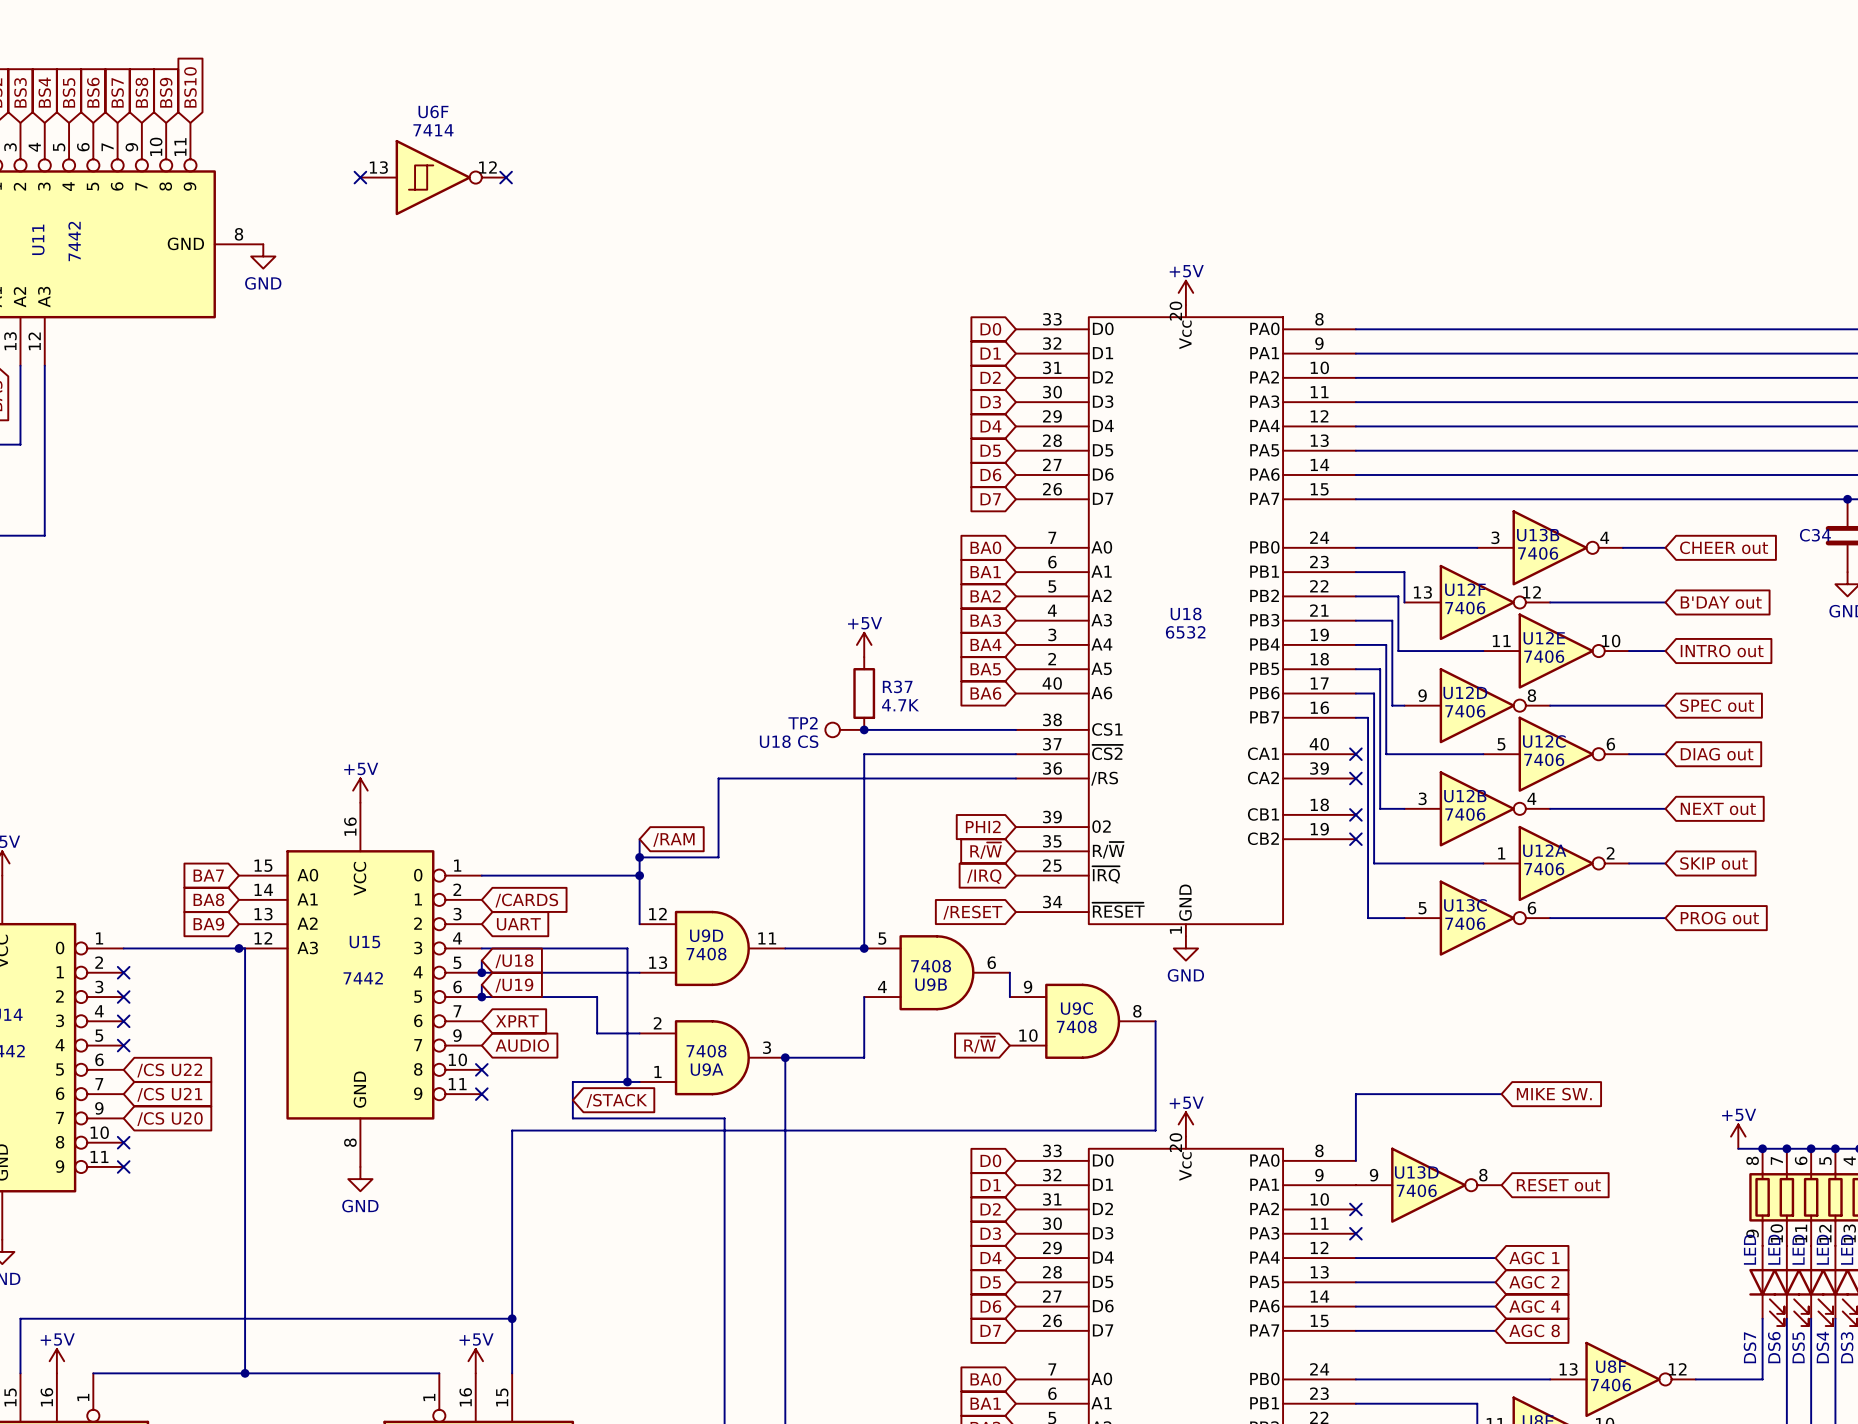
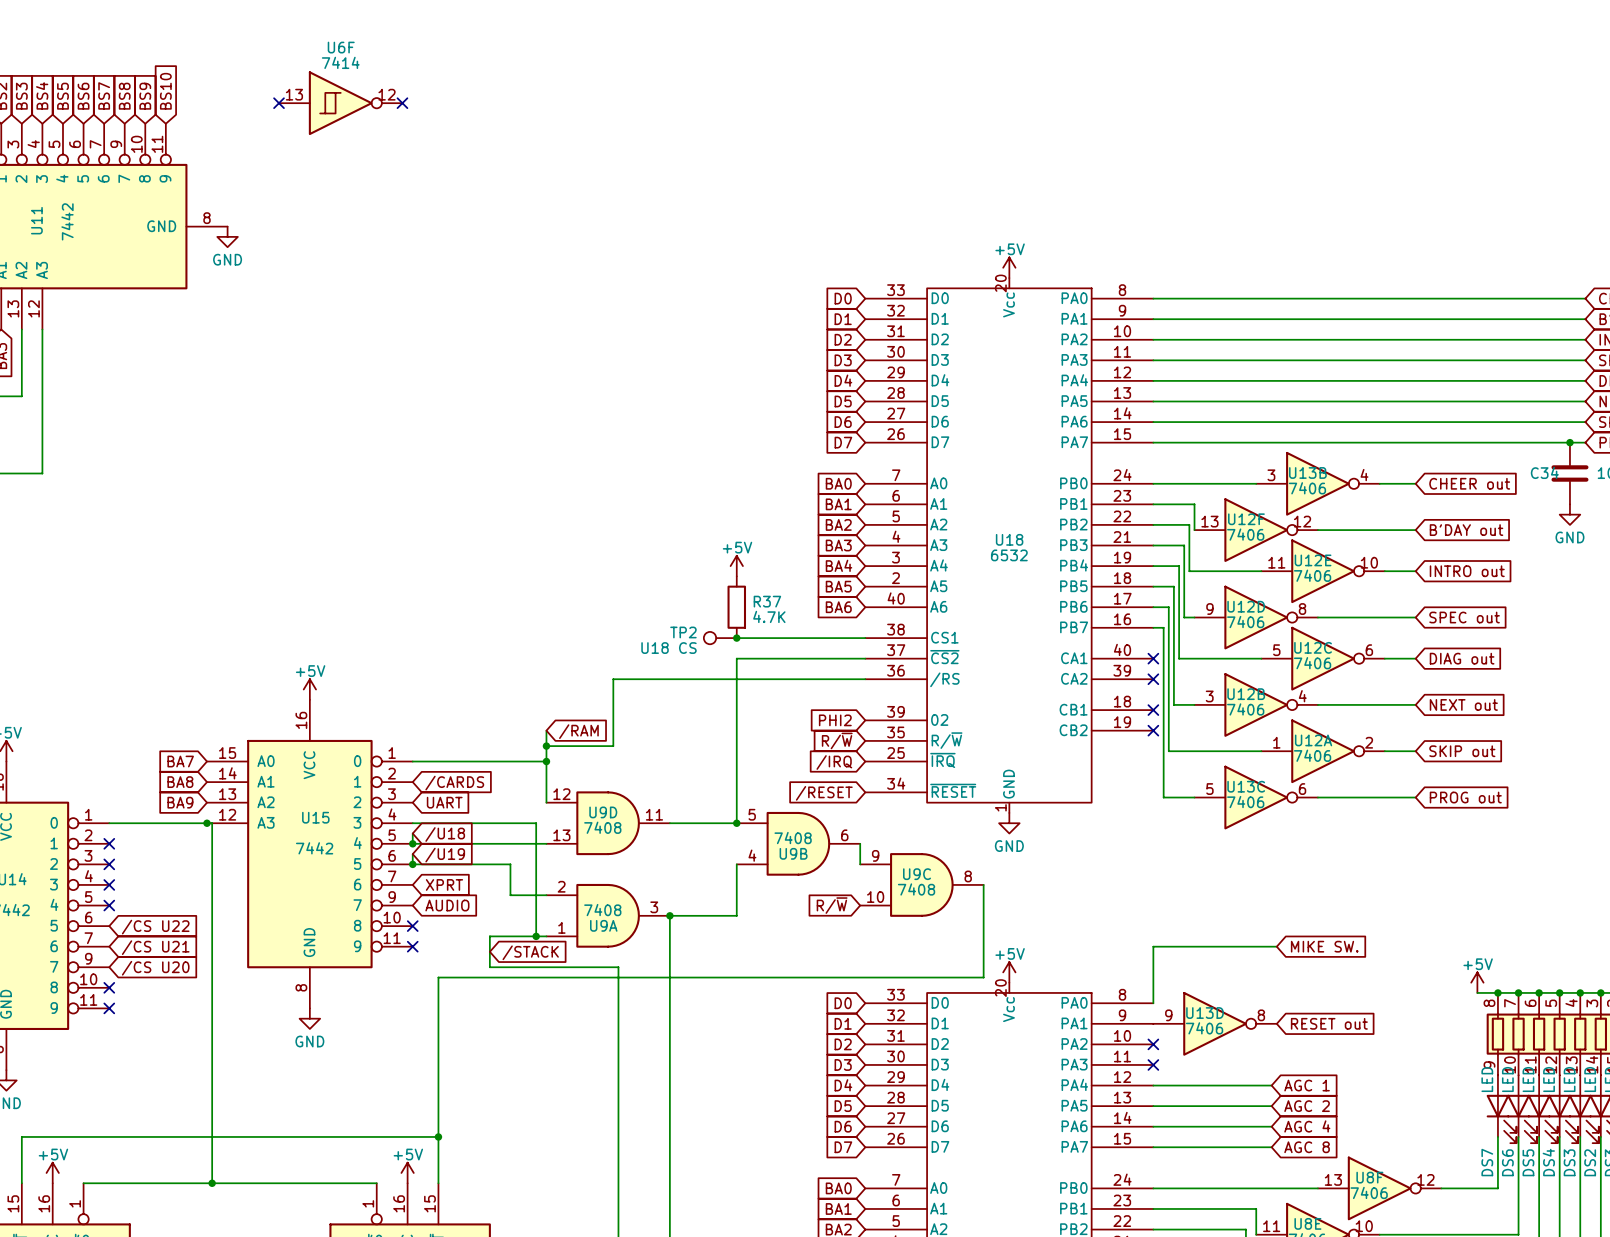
no-connect mark: none -> (279, 103)
no-connect mark: none -> (402, 103)
no-connect mark: (360, 177) -> none
U6F position: (433, 177) -> (340, 103)
no-connect mark: (506, 177) -> none

